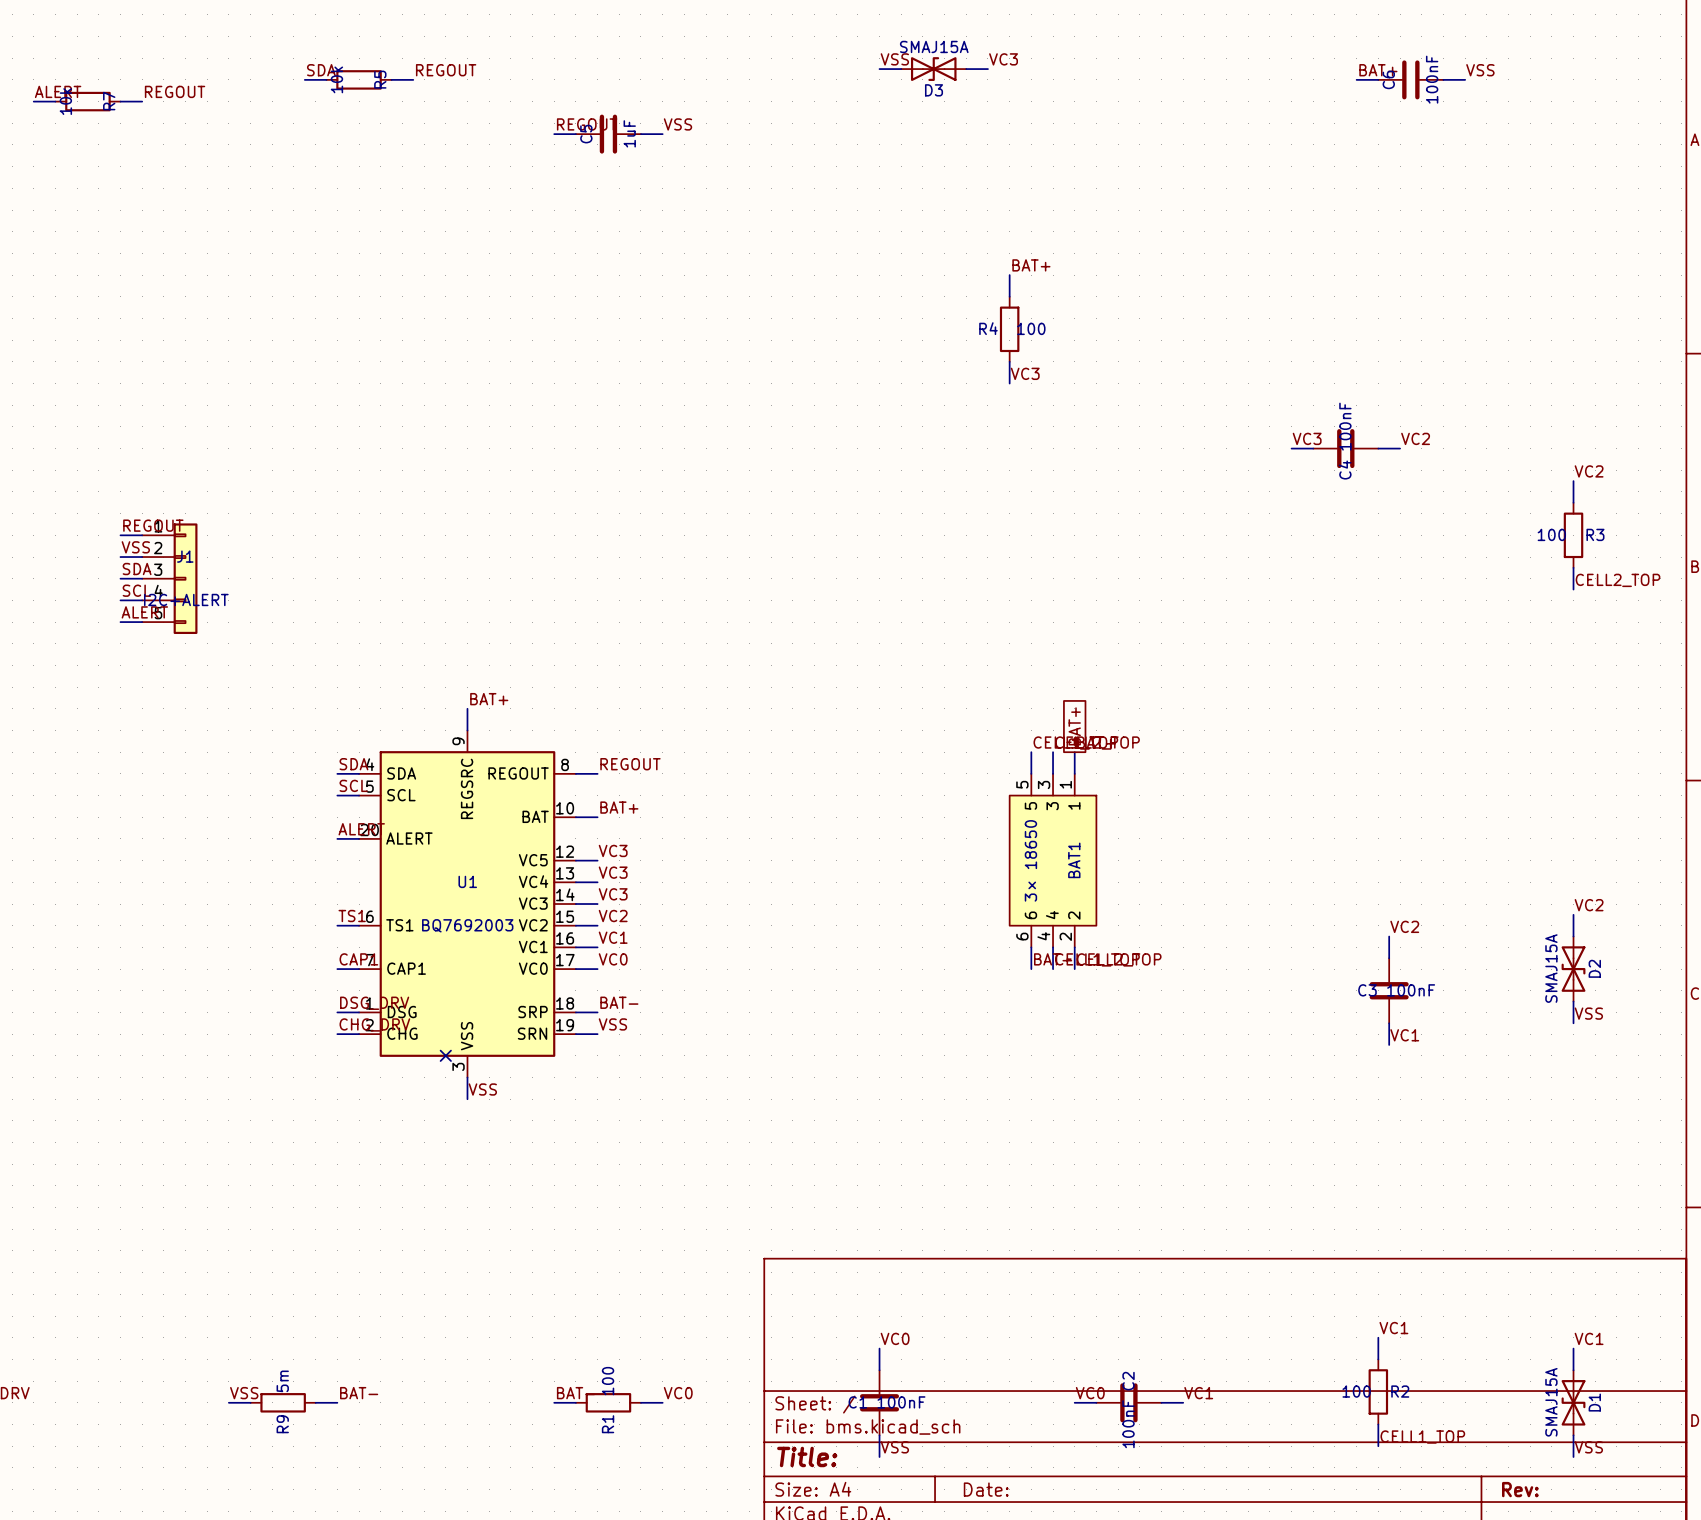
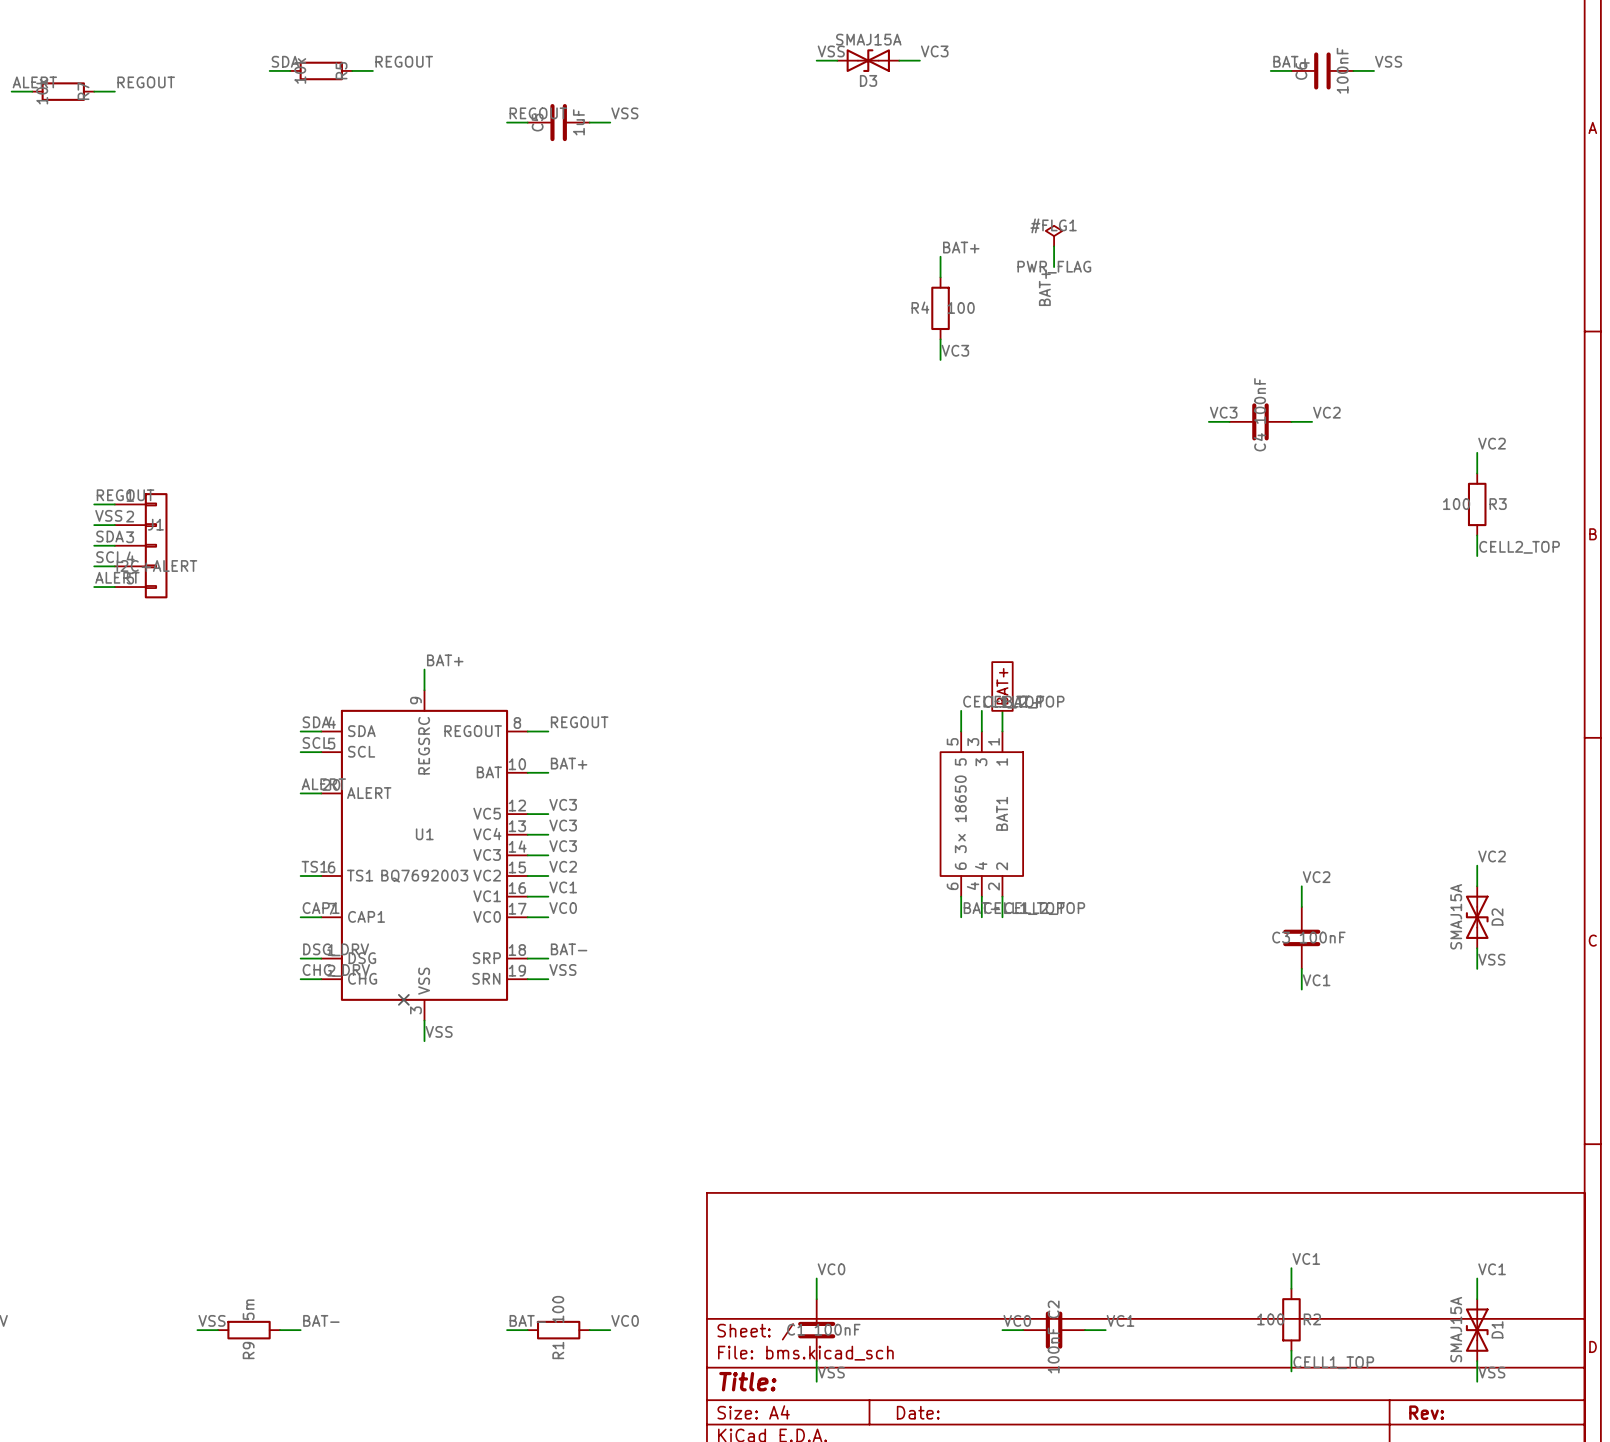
#FLG1: none -> PWR_FLAG (1054, 236)
wire: none -> (1054, 246) (1054, 267)
label: none -> BAT+ (1044, 287)

